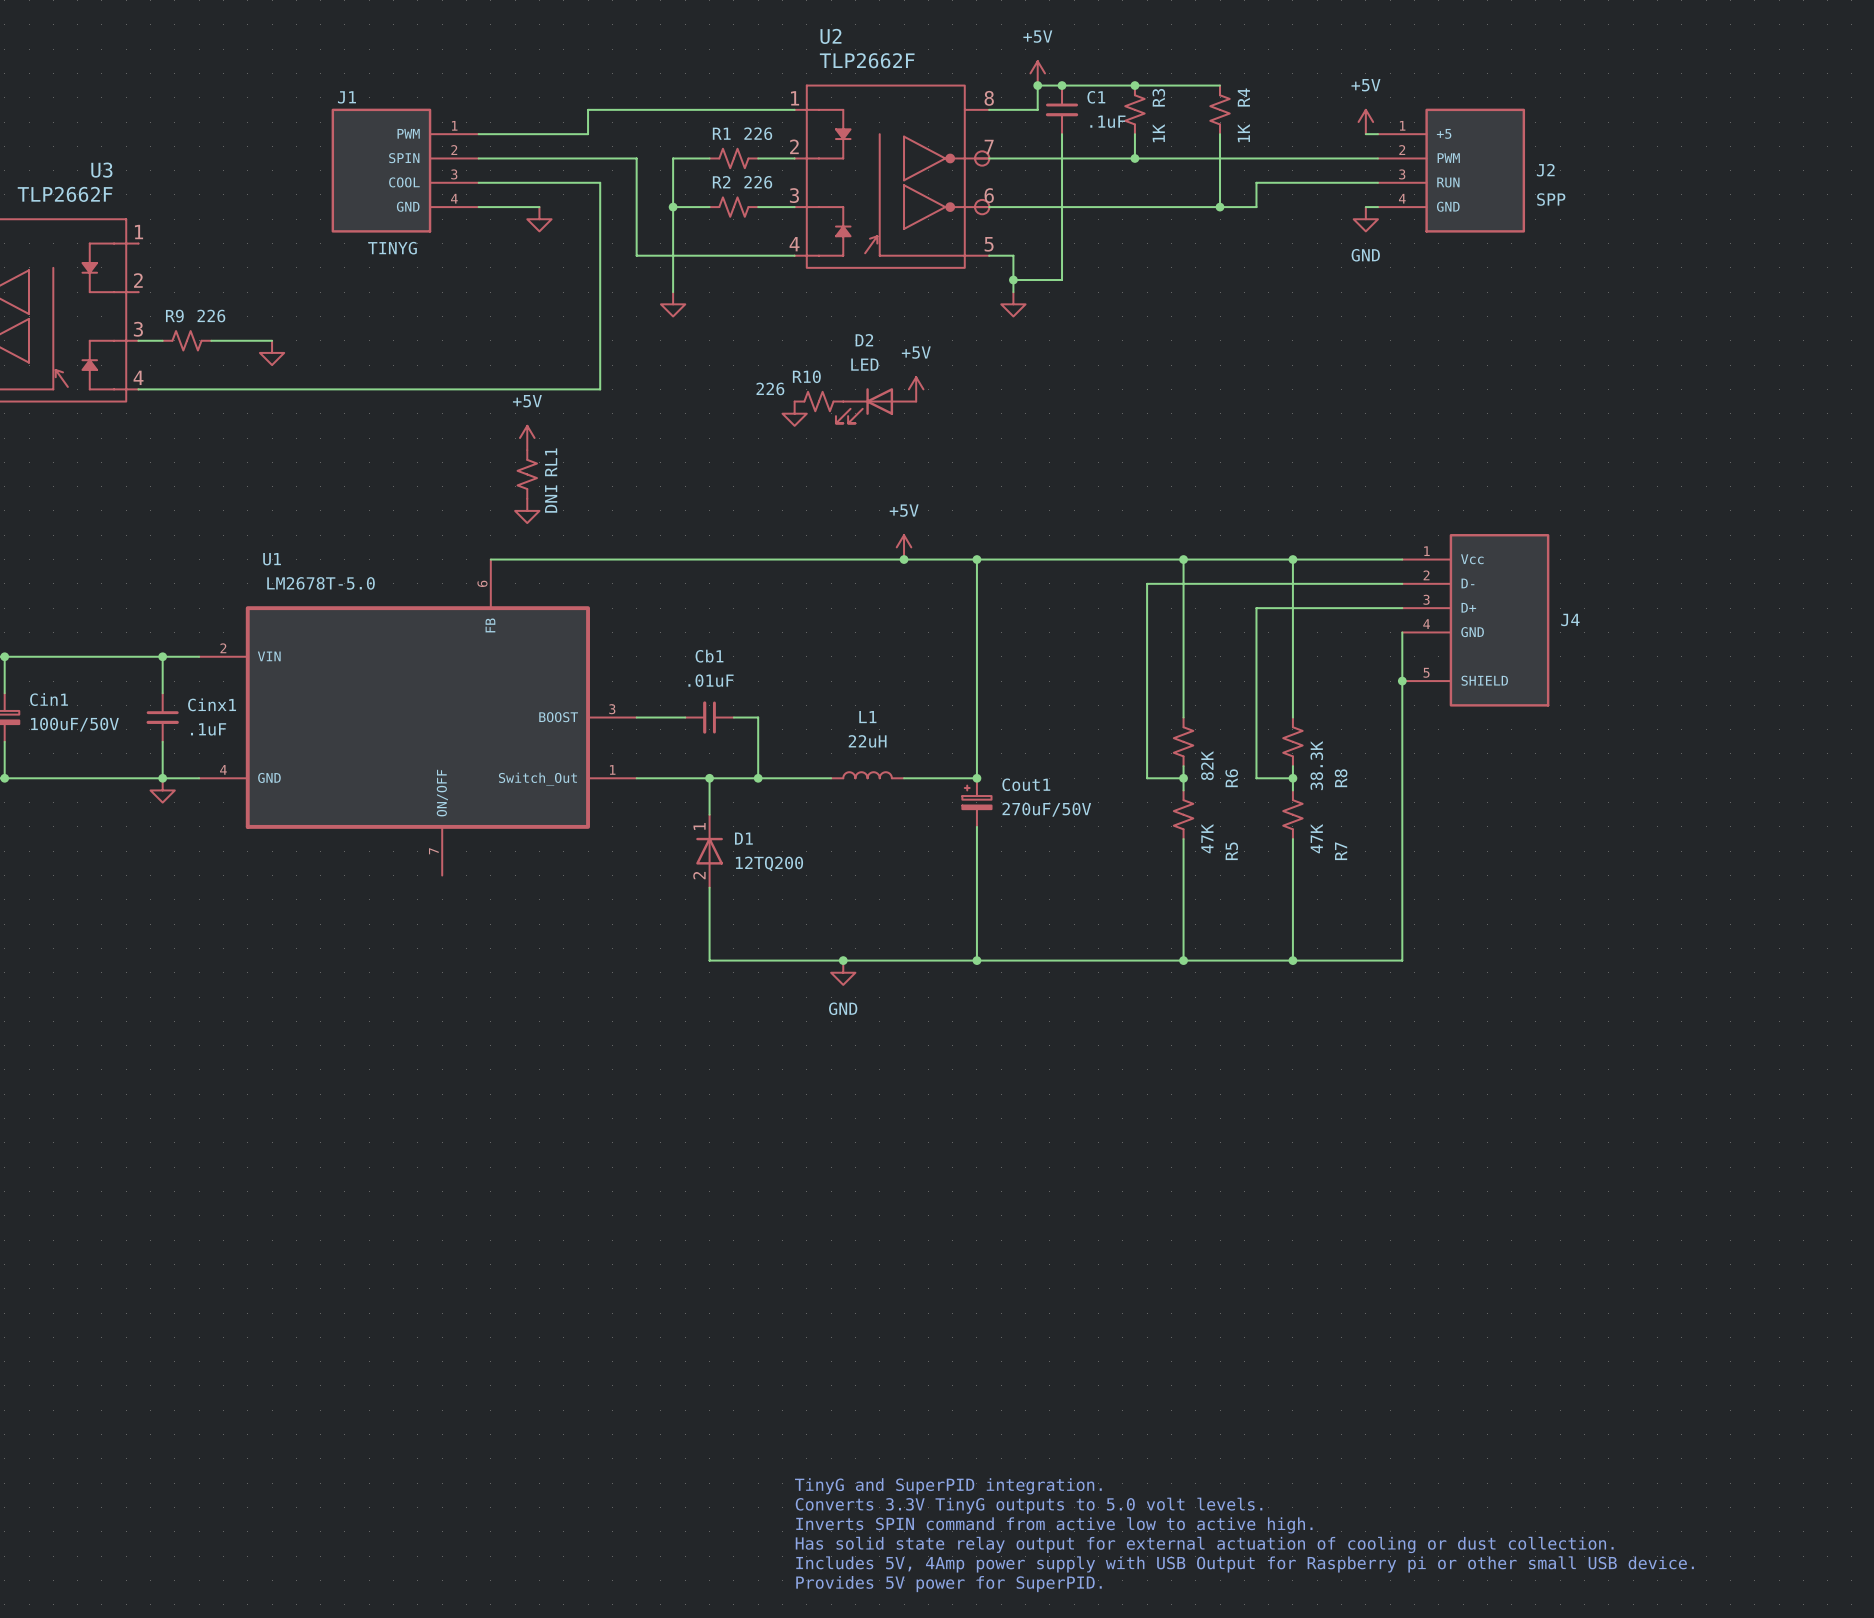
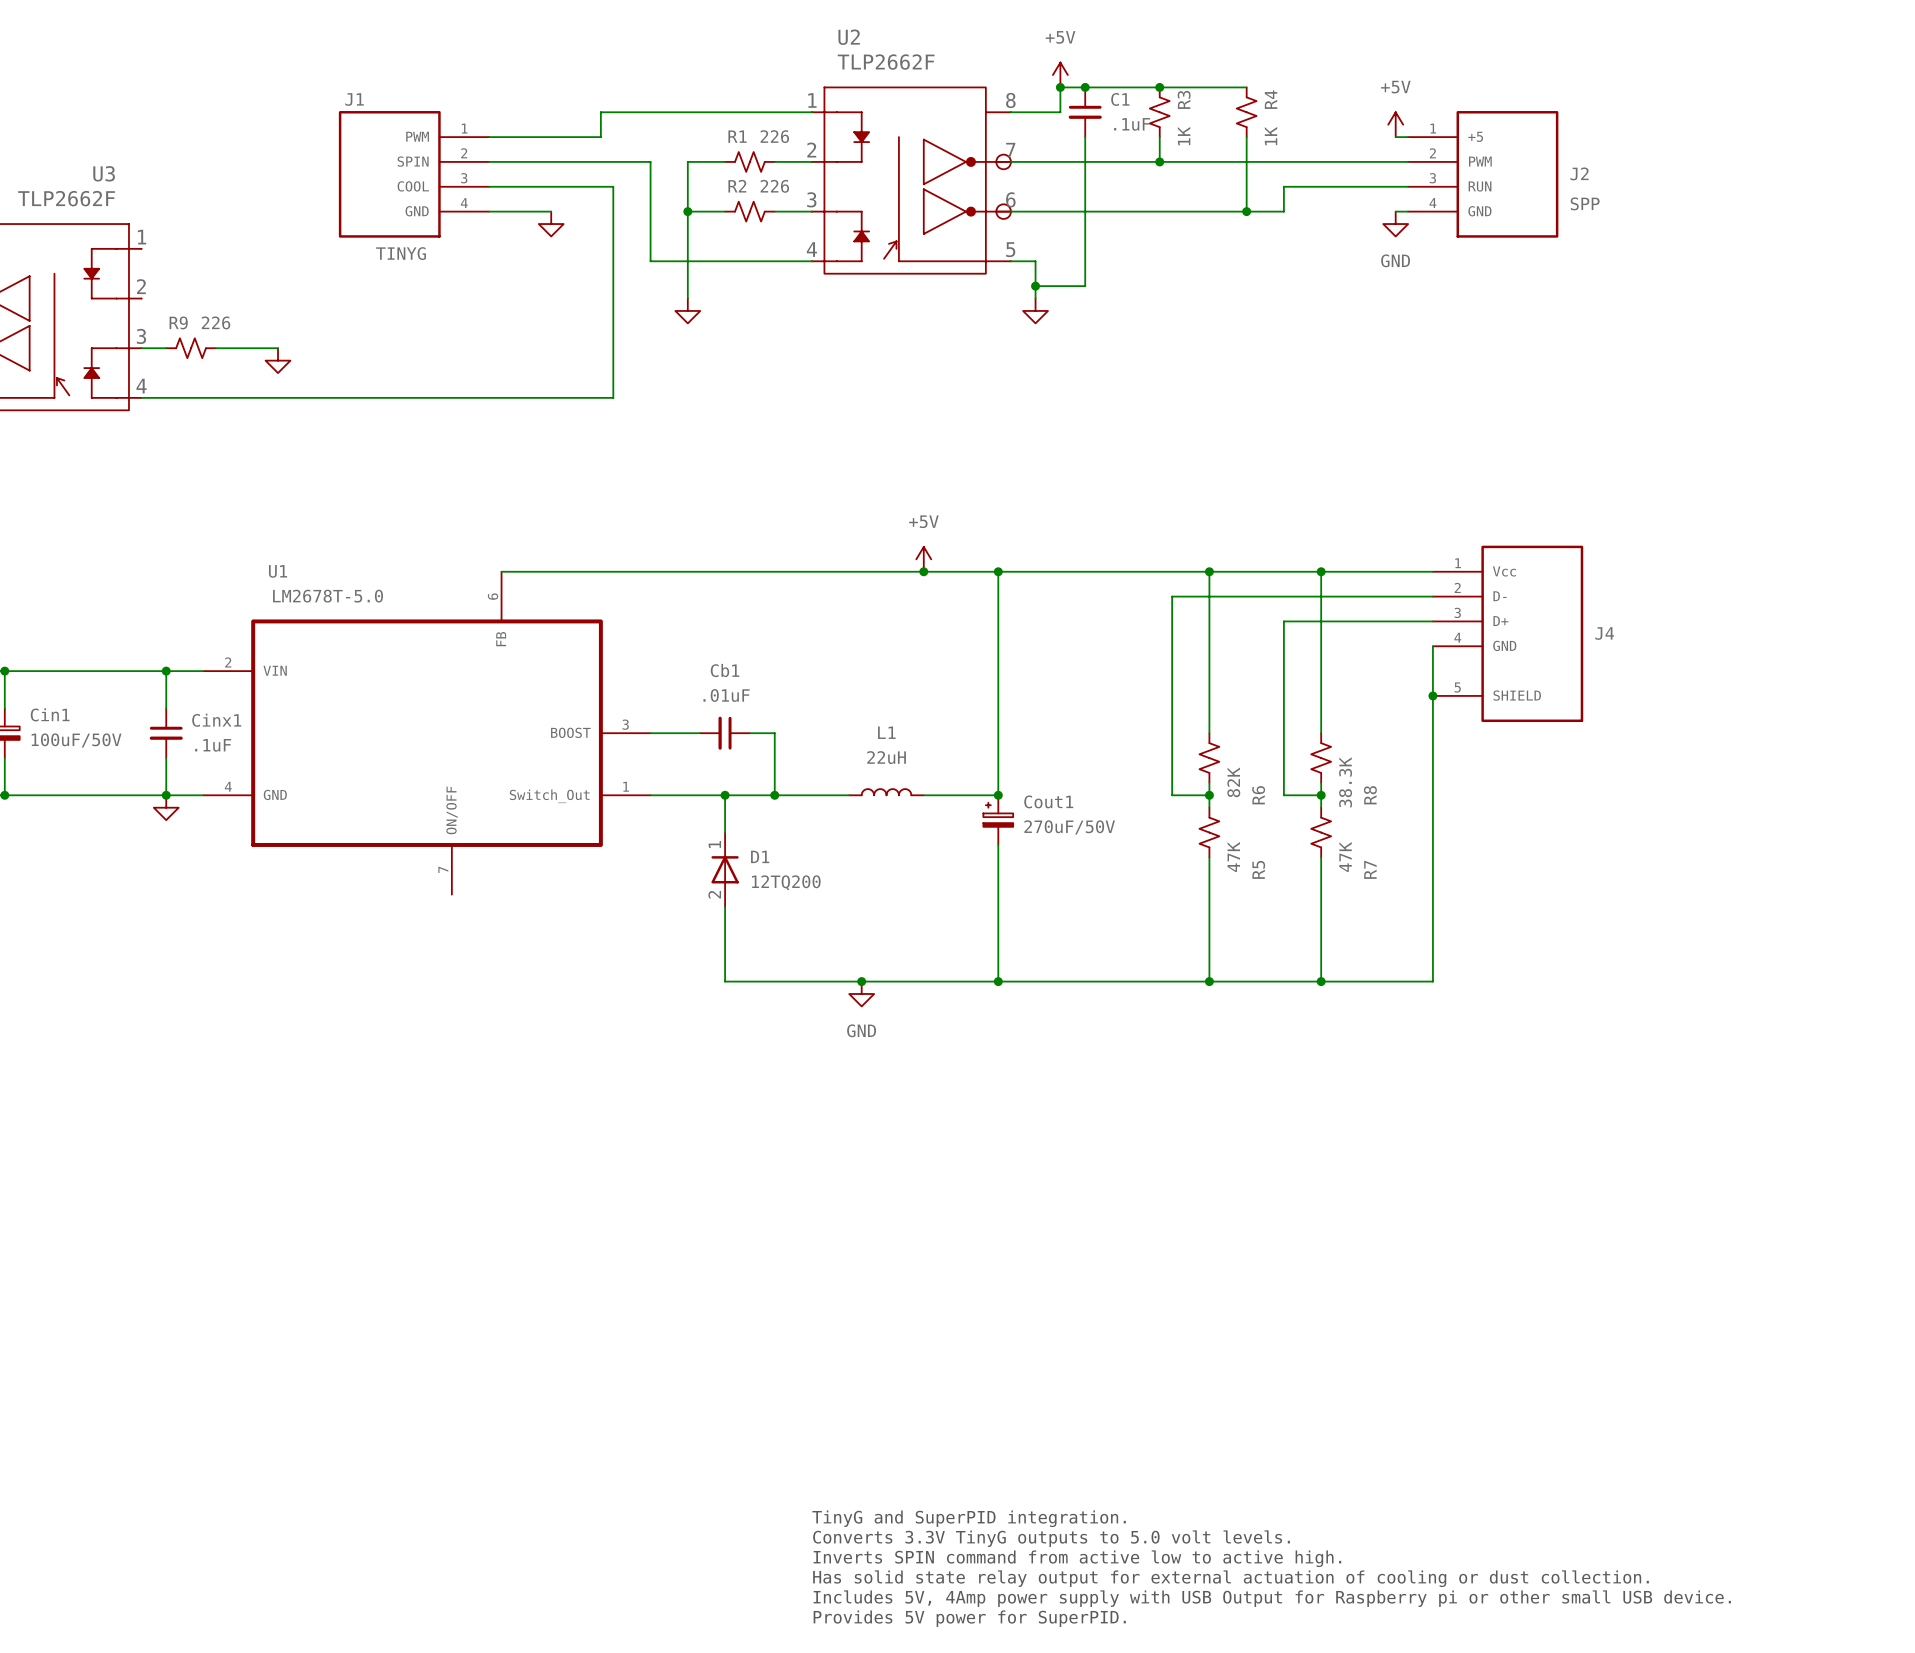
power symbol: +5V (916, 389) -> none
R10: 226 (818, 401) -> none
D2: LED (876, 405) -> none
power symbol: (794, 413) -> none
power symbol: +5V (527, 438) -> none
RL1: DNI (527, 474) -> none
power symbol: (527, 510) -> none

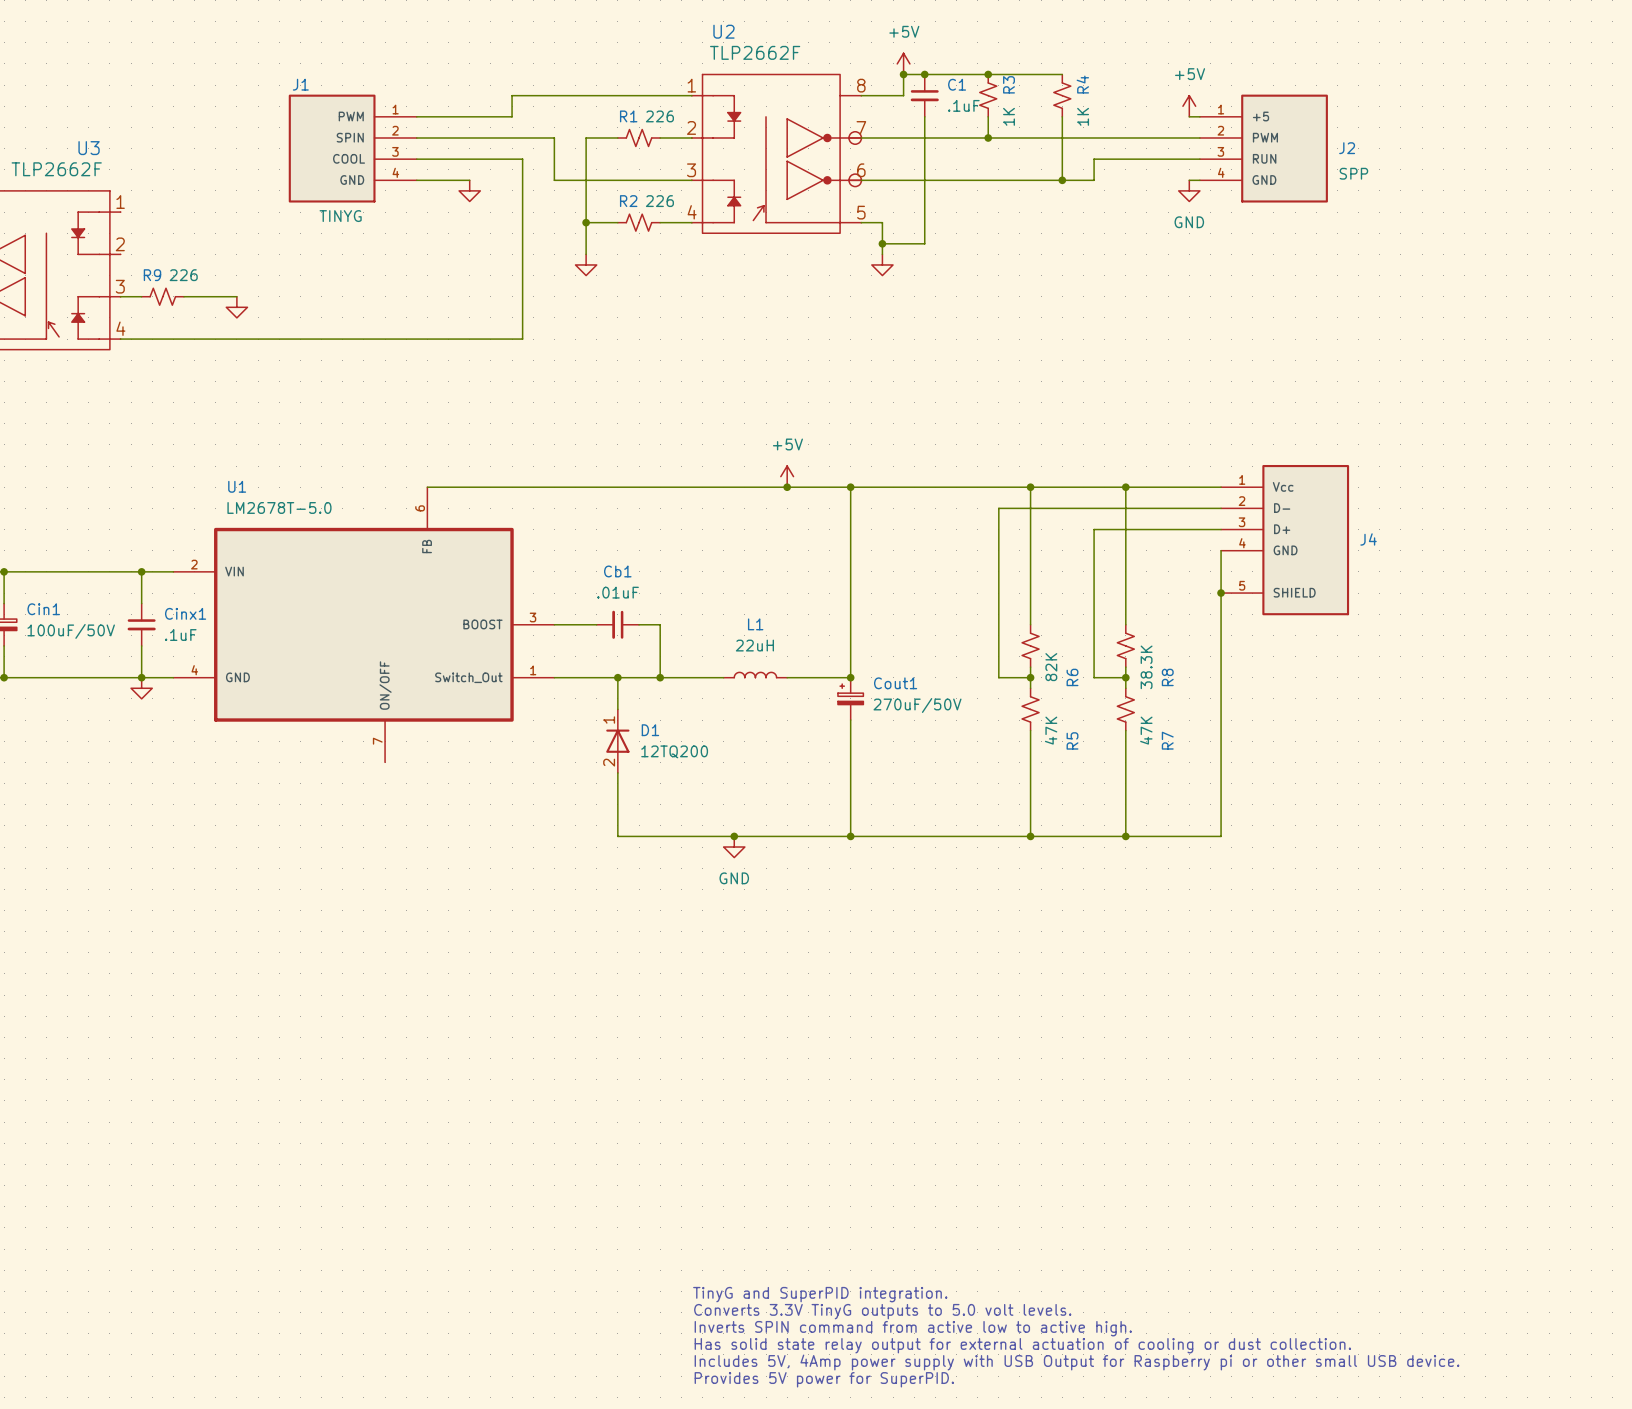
wire: (650, 211) (650, 261) (687, 261) -> (554, 180) (586, 180)
junction position: (687, 211) -> (586, 222)
R2 position: (749, 211) -> (639, 222)

